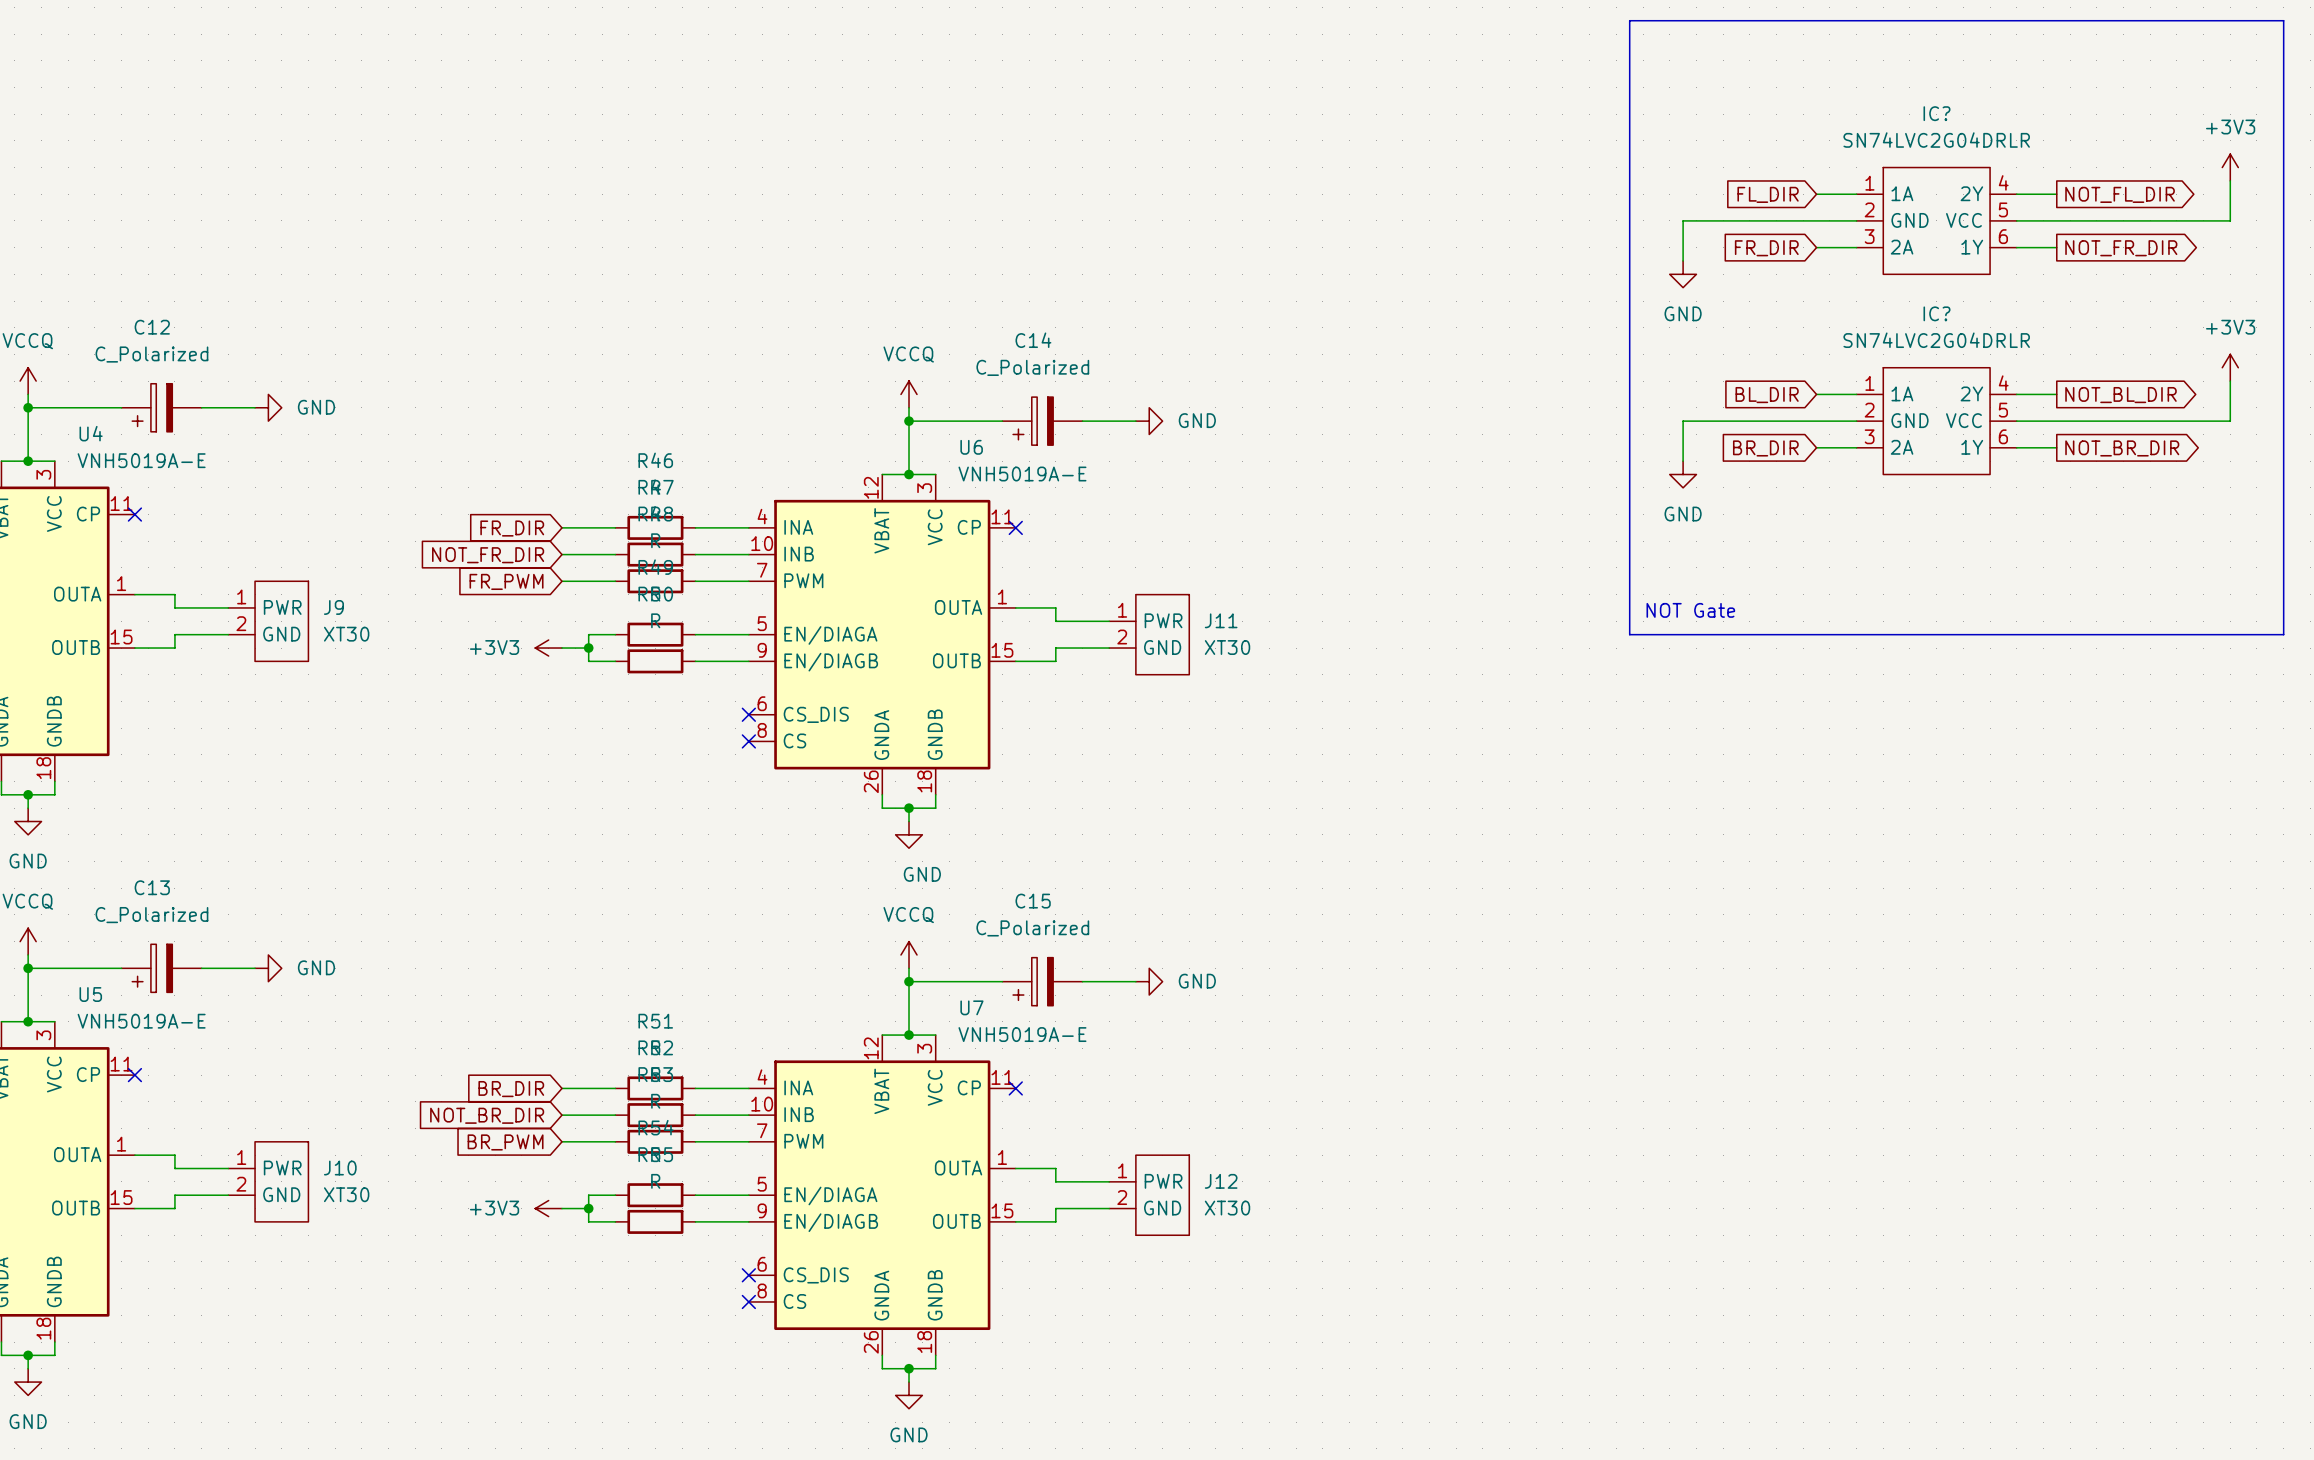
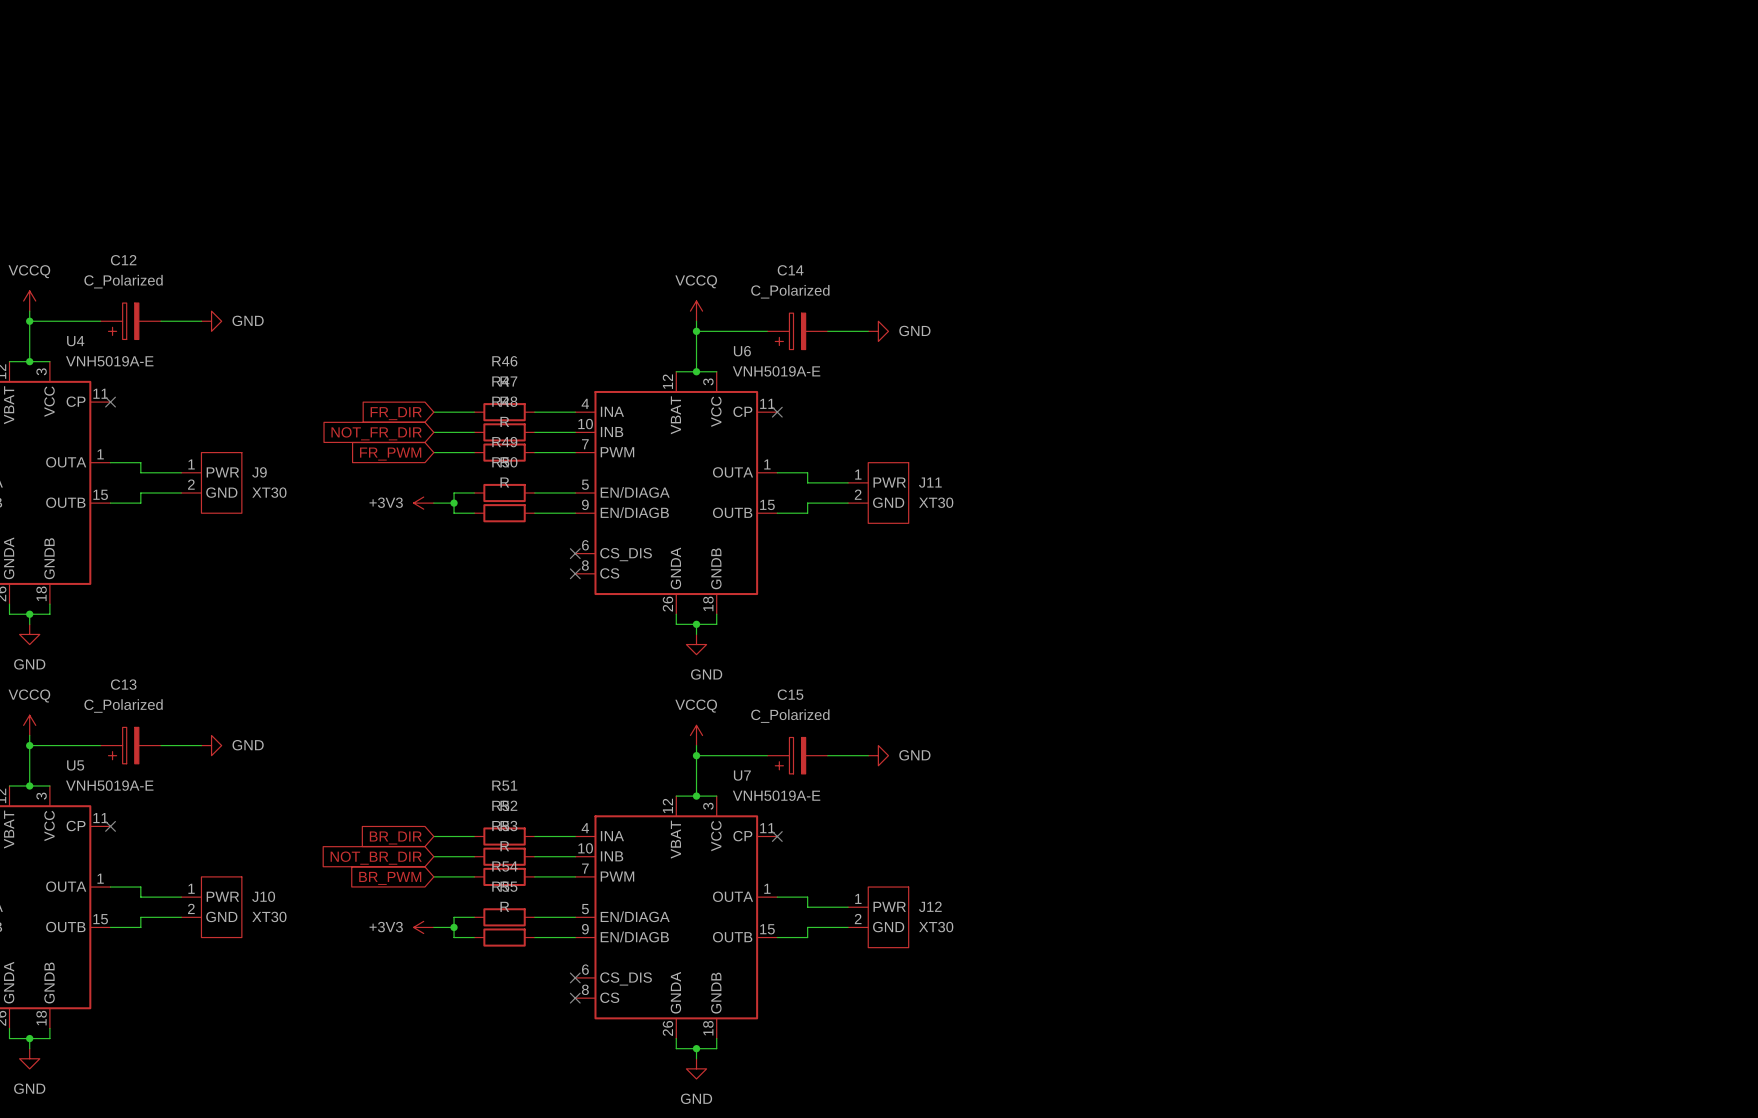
line: (1629, 20) (1629, 634) (2283, 634) (2283, 20) (1629, 20) -> none
power symbol: +3V3 (2230, 167) -> none
wire: (2230, 180) (2230, 220) (2016, 220) -> none
global label: FL_DIR (1768, 194) -> none
wire: (1816, 194) (1856, 194) -> none
wire: (2016, 194) (2056, 194) -> none
global label: NOT_FL_DIR (2120, 194) -> none
wire: (1856, 220) (1683, 220) (1683, 260) -> none
IC?: SN74LVC2G04DRLR (1936, 220) -> none
wire: (1816, 247) (1856, 247) -> none
wire: (2016, 247) (2056, 247) -> none
global label: FR_DIR (1766, 248) -> none
global label: NOT_FR_DIR (2121, 248) -> none
power symbol: GND (1683, 274) -> none
power symbol: +3V3 (2230, 367) -> none
wire: (2230, 381) (2230, 421) (2016, 421) -> none
wire: (1816, 394) (1856, 394) -> none
wire: (2016, 394) (2056, 394) -> none
global label: BL_DIR (1767, 395) -> none
global label: NOT_BL_DIR (2120, 395) -> none
wire: (1856, 421) (1683, 421) (1683, 461) -> none
IC?: SN74LVC2G04DRLR (1936, 421) -> none
wire: (1816, 447) (1856, 447) -> none
wire: (2016, 447) (2056, 447) -> none
global label: BR_DIR (1765, 448) -> none
global label: NOT_BR_DIR (2122, 448) -> none
power symbol: GND (1683, 474) -> none
text: NOT Gate (1690, 610) -> none

